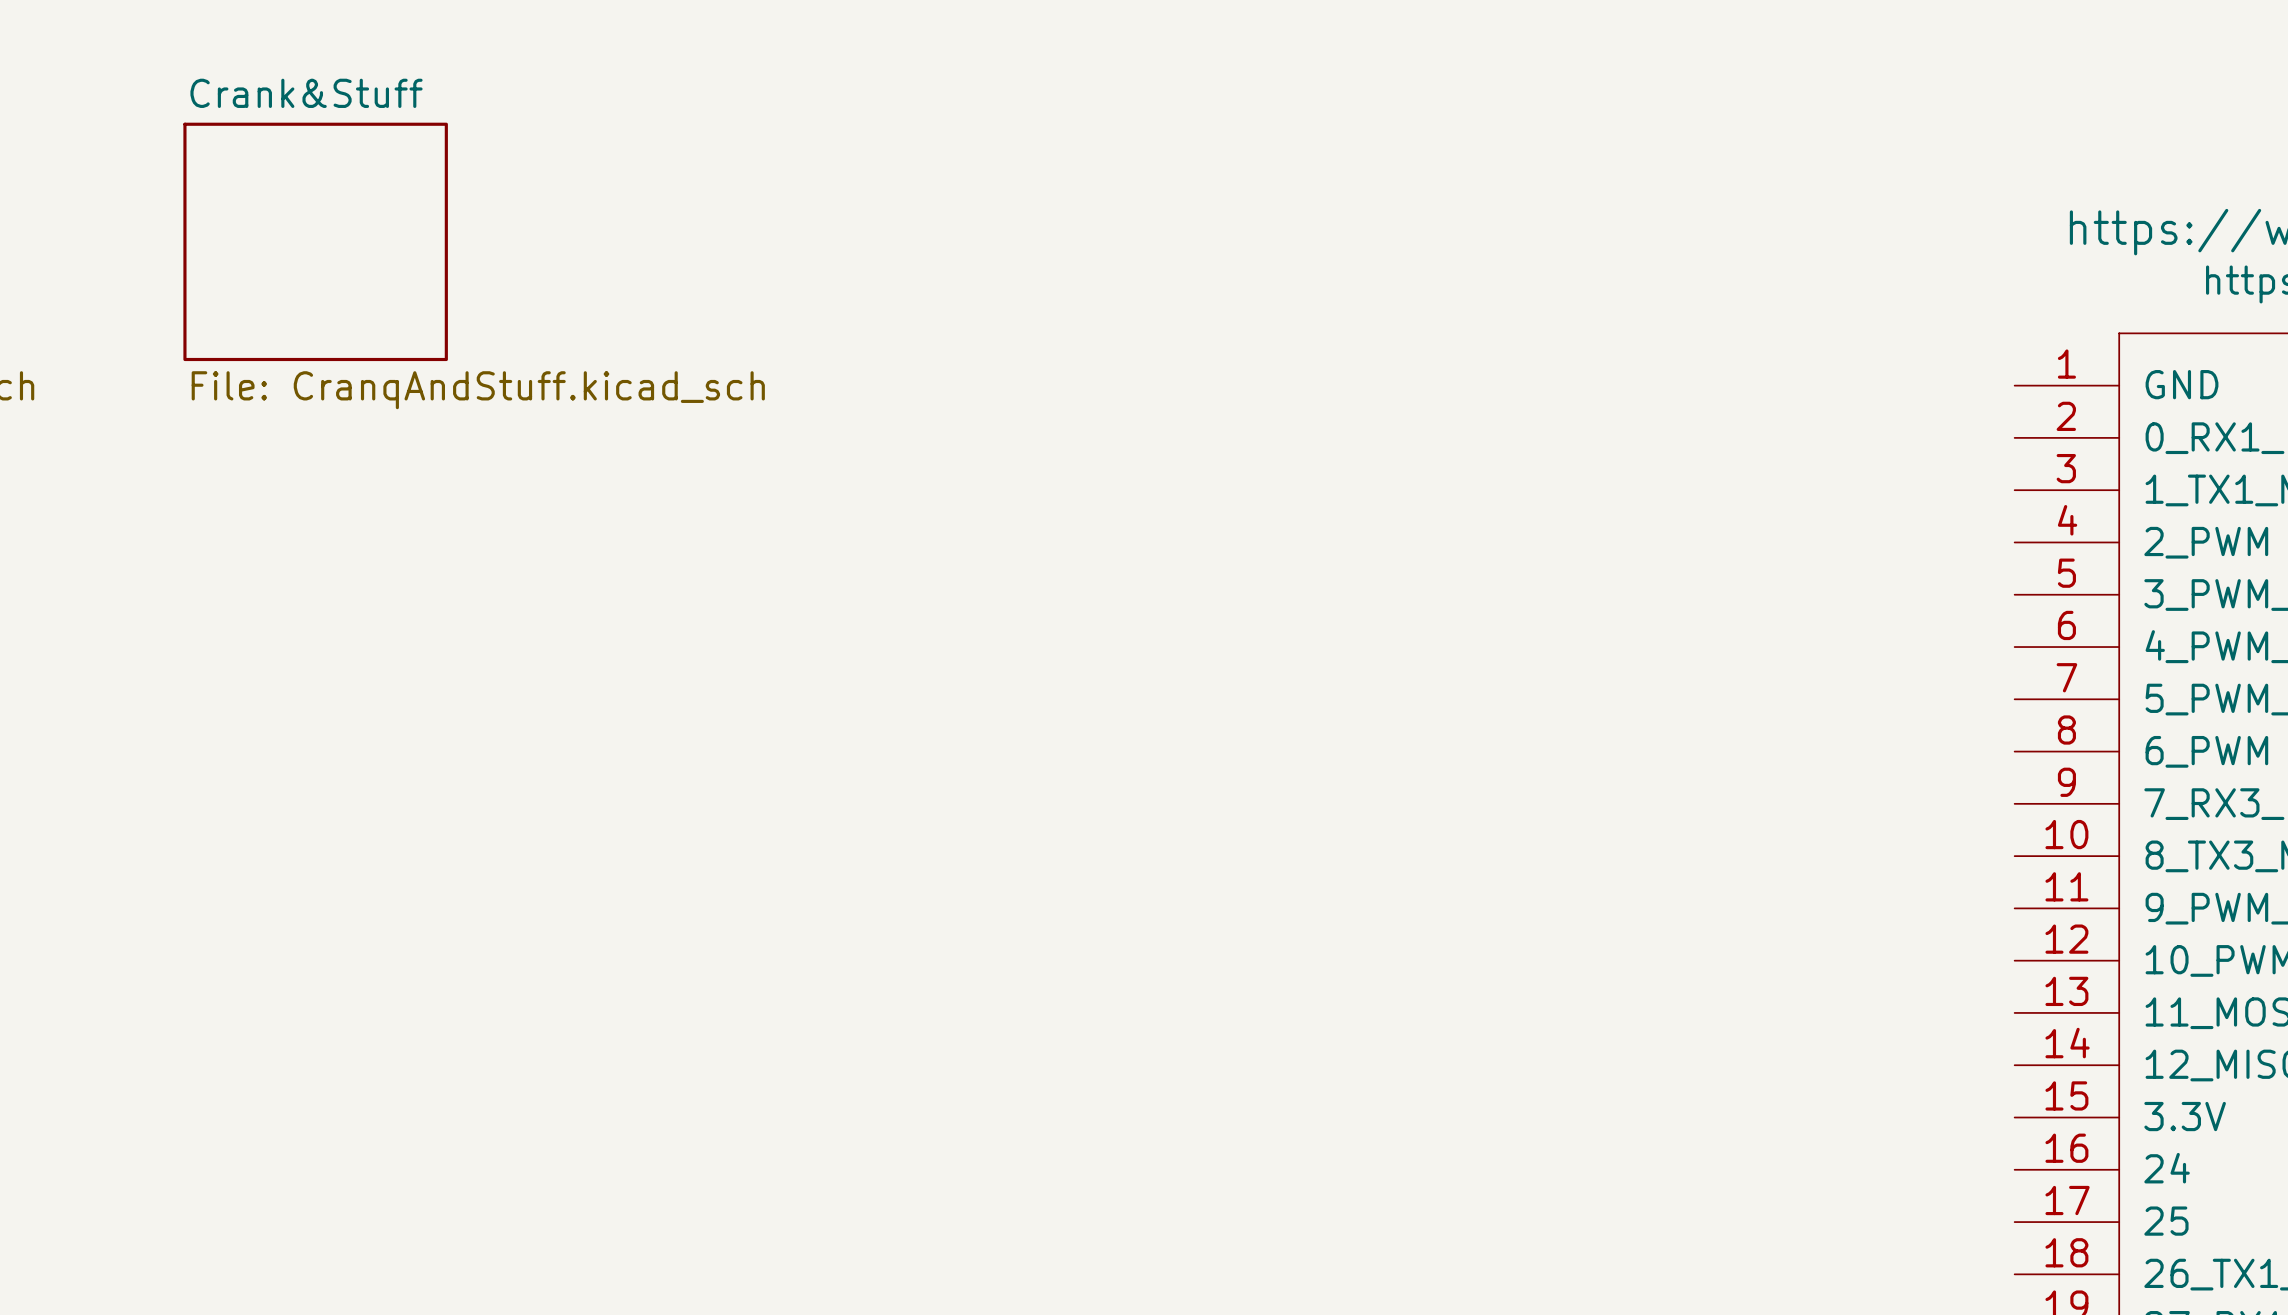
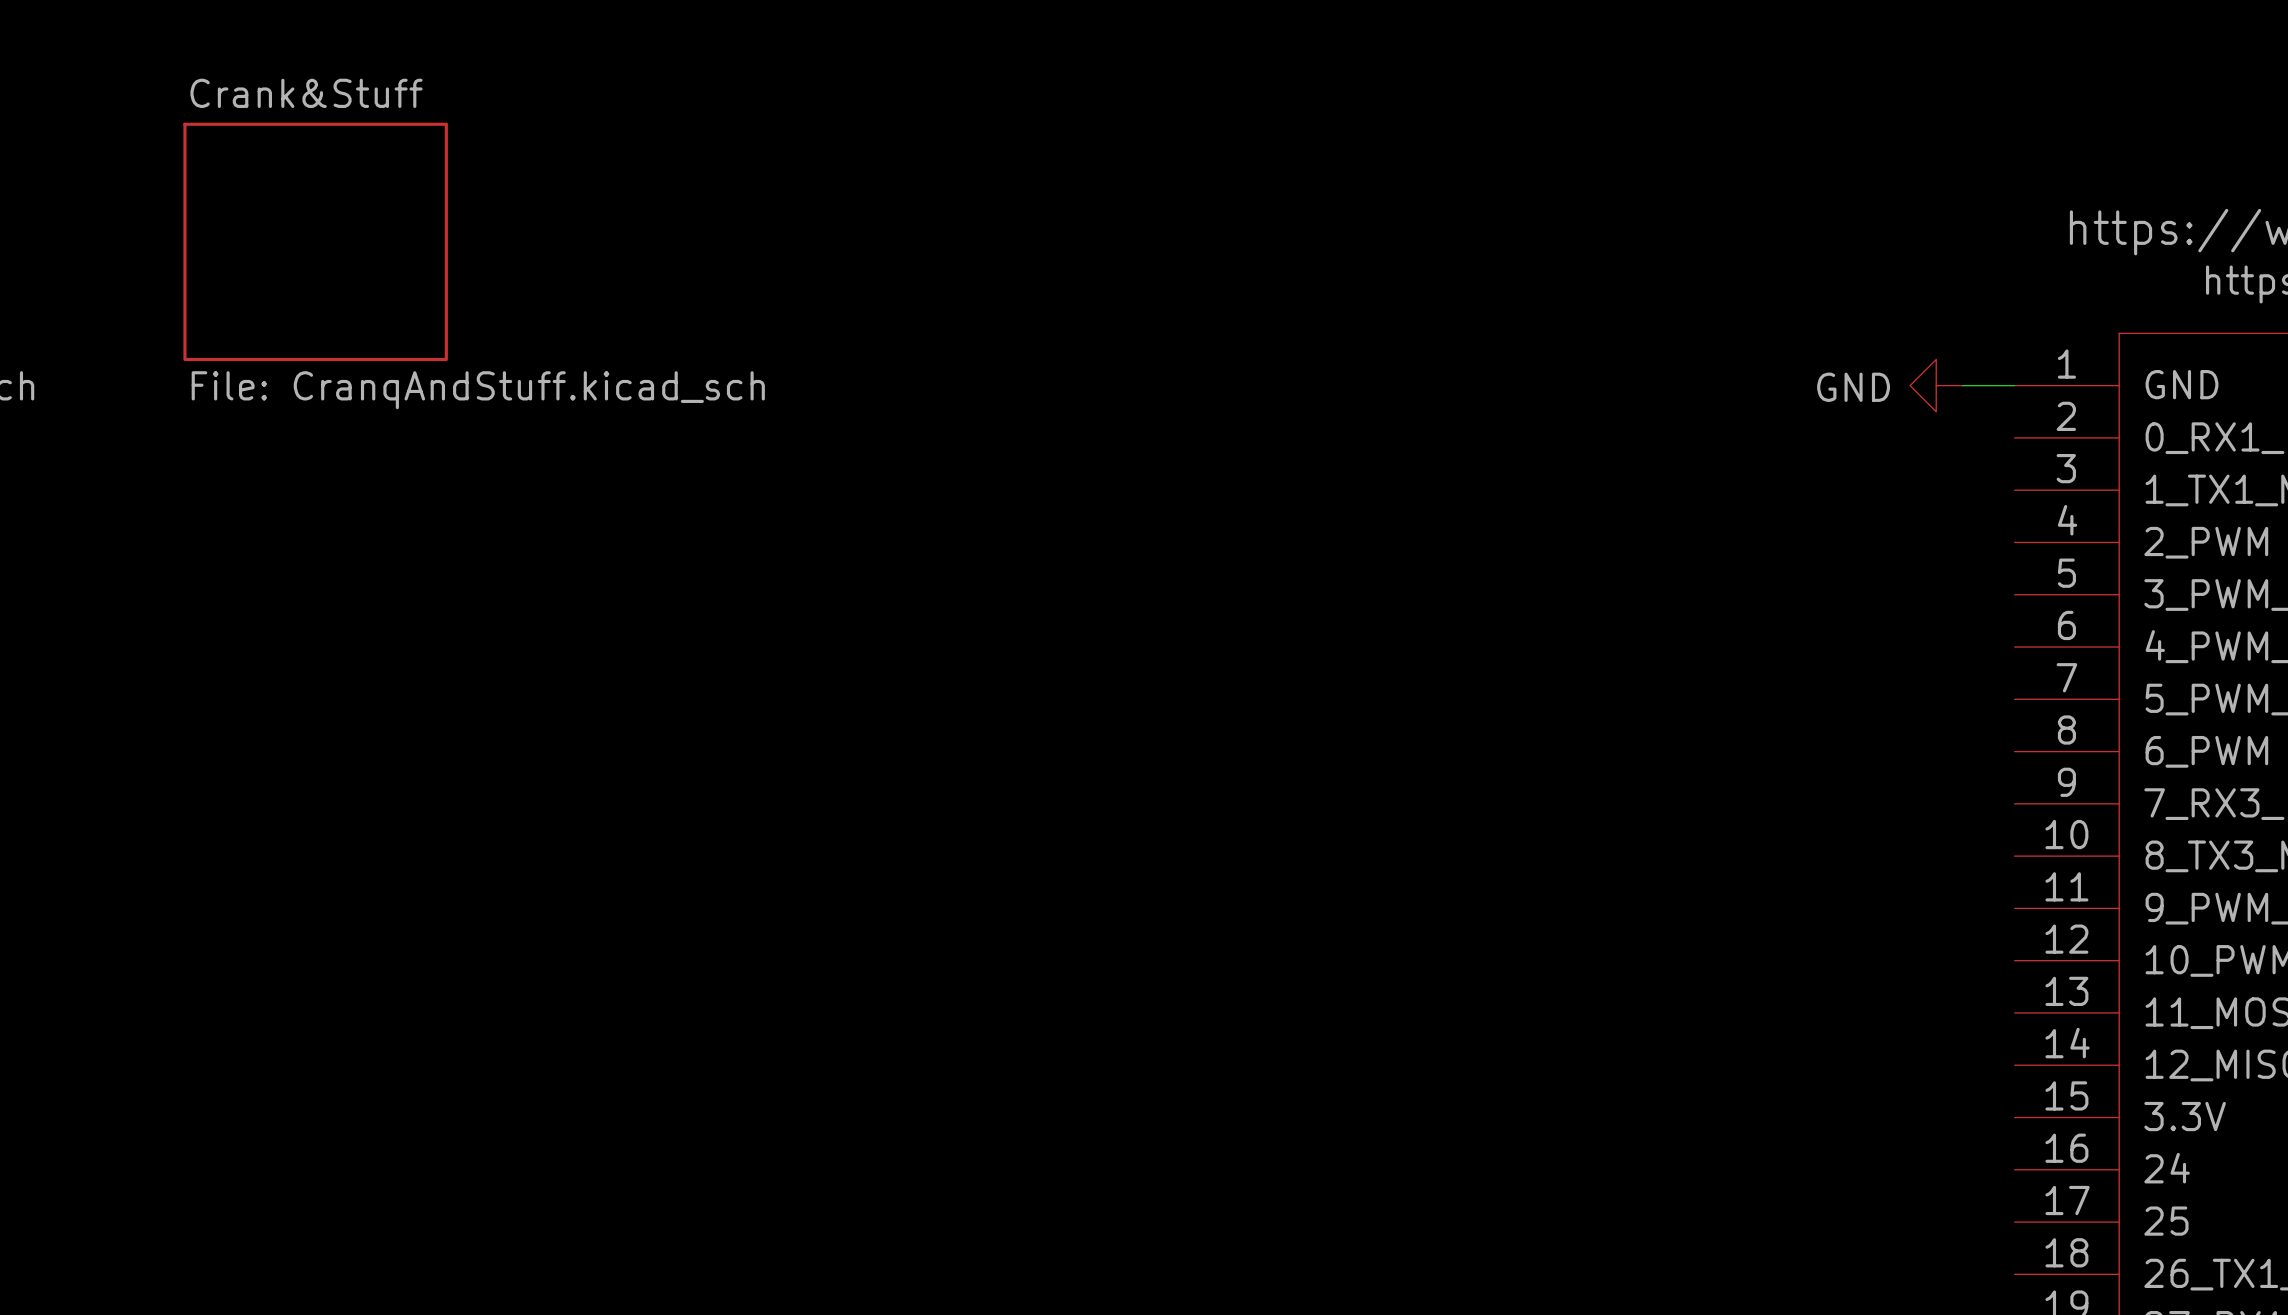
power symbol: none -> GND (1936, 385)
wire: none -> (1962, 385) (2014, 385)

